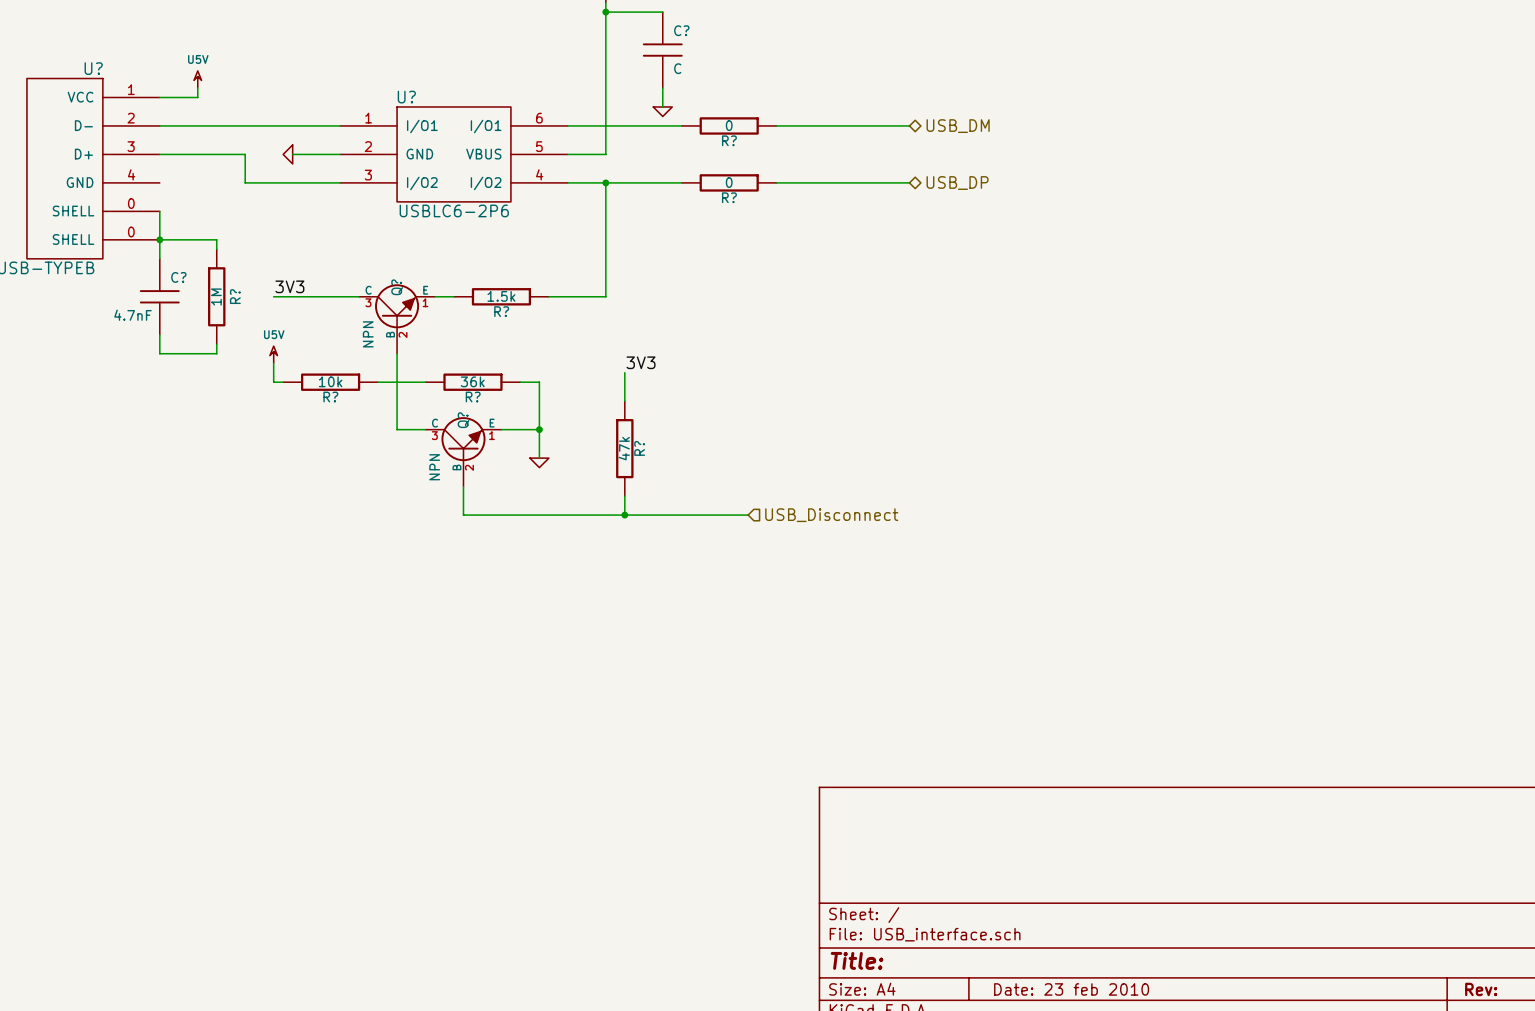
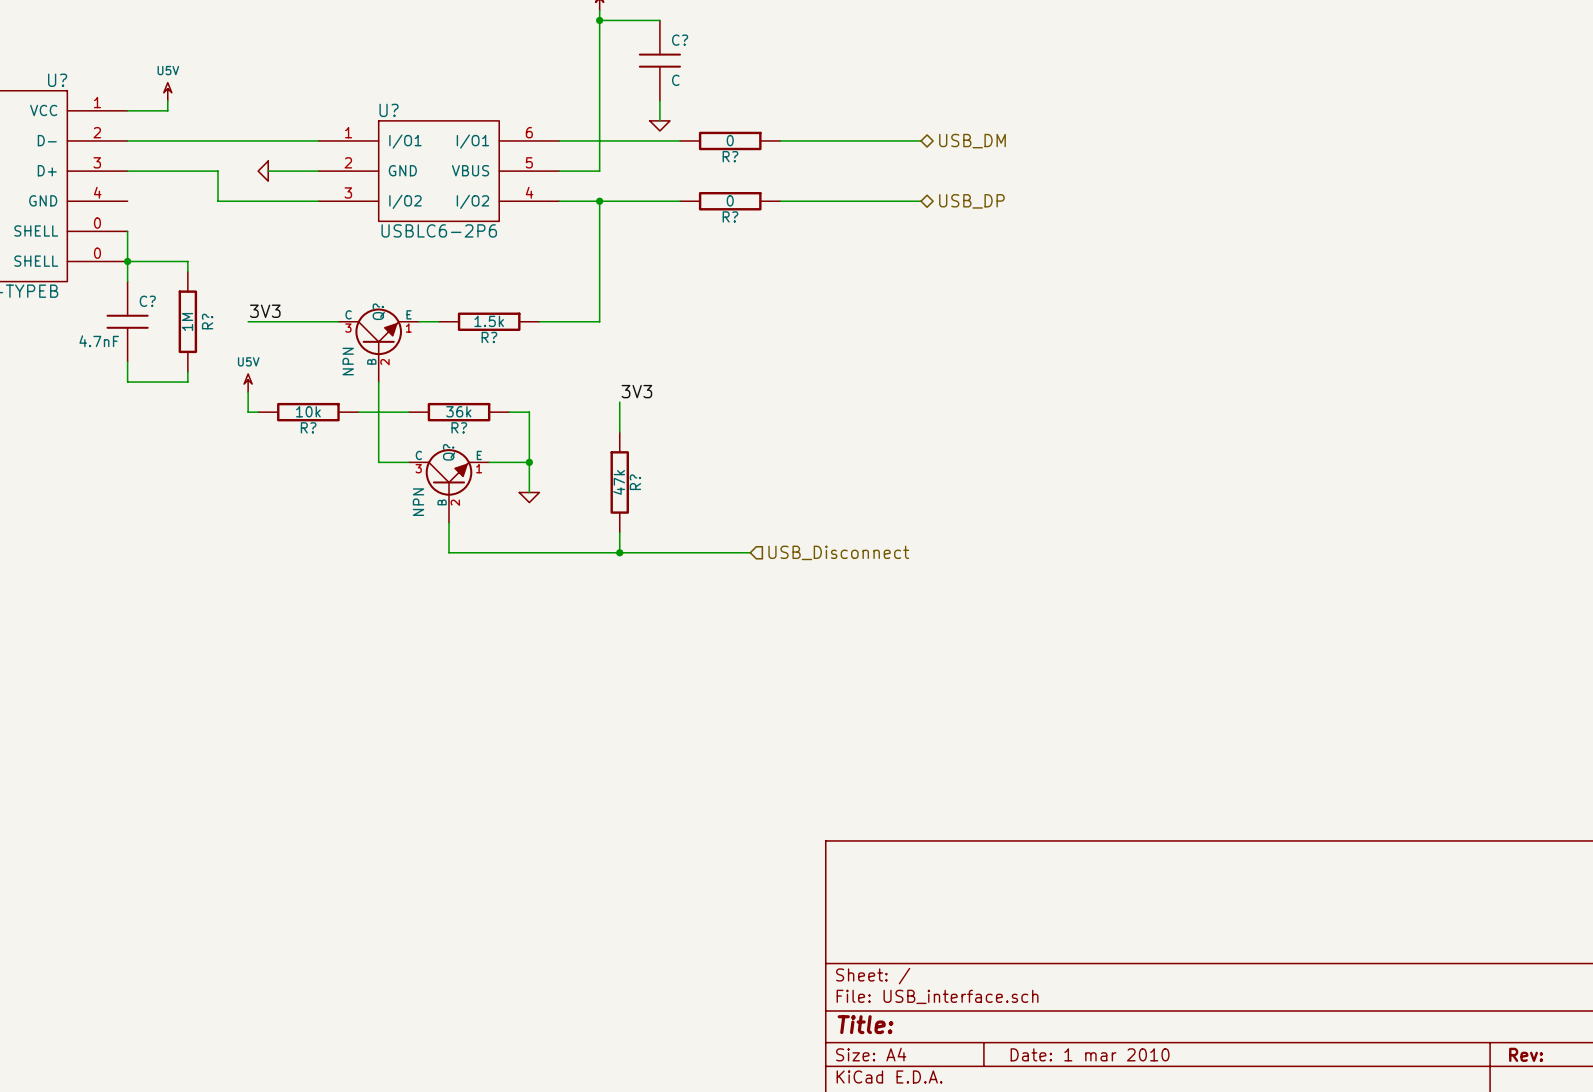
title block: Date: 23 feb 2010 (1071, 989) -> Date: 1 mar 2010 (1090, 1054)

